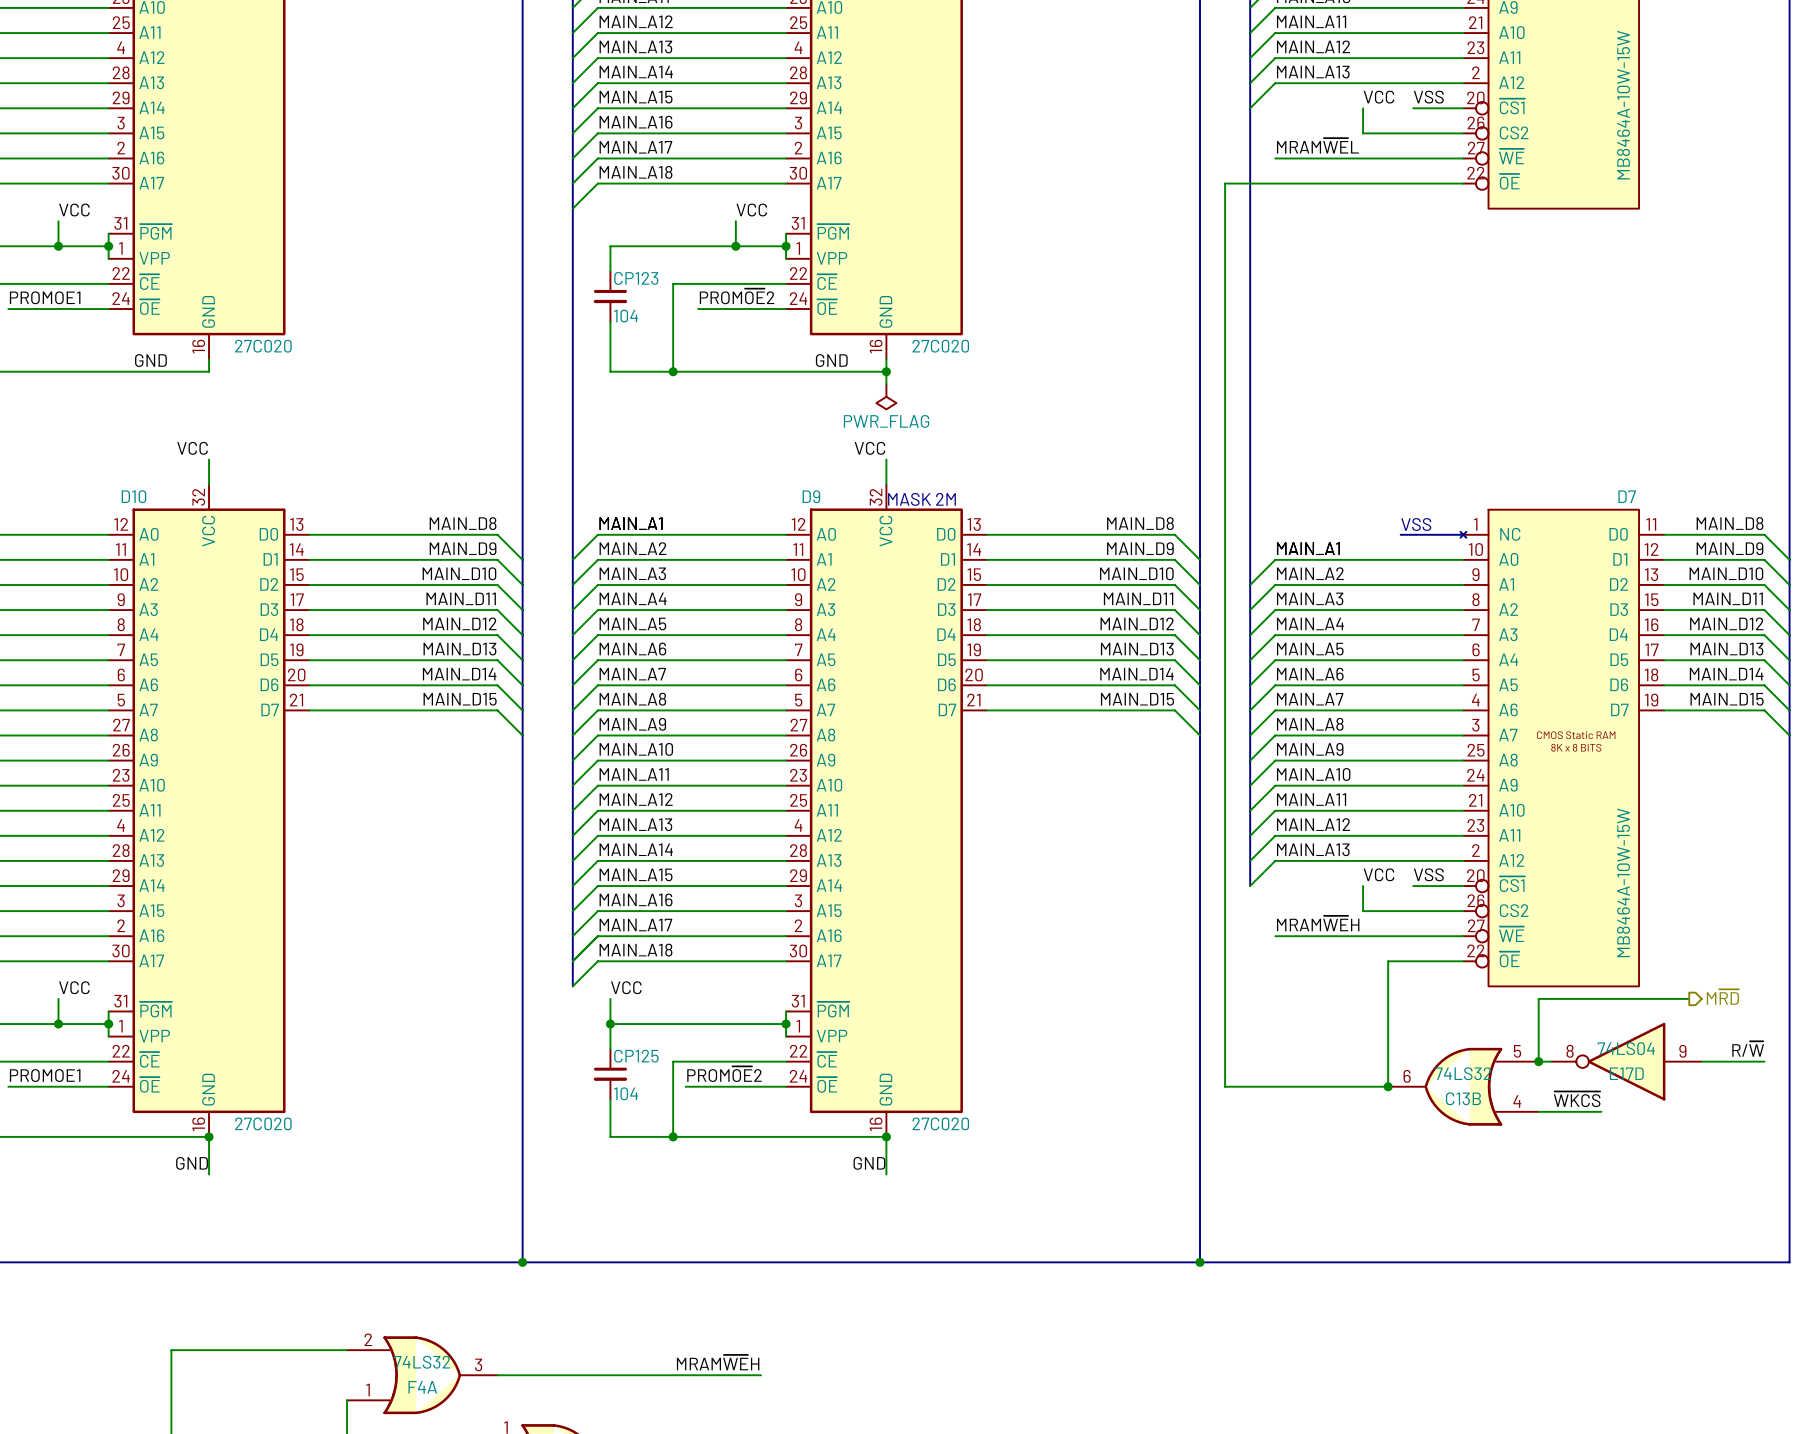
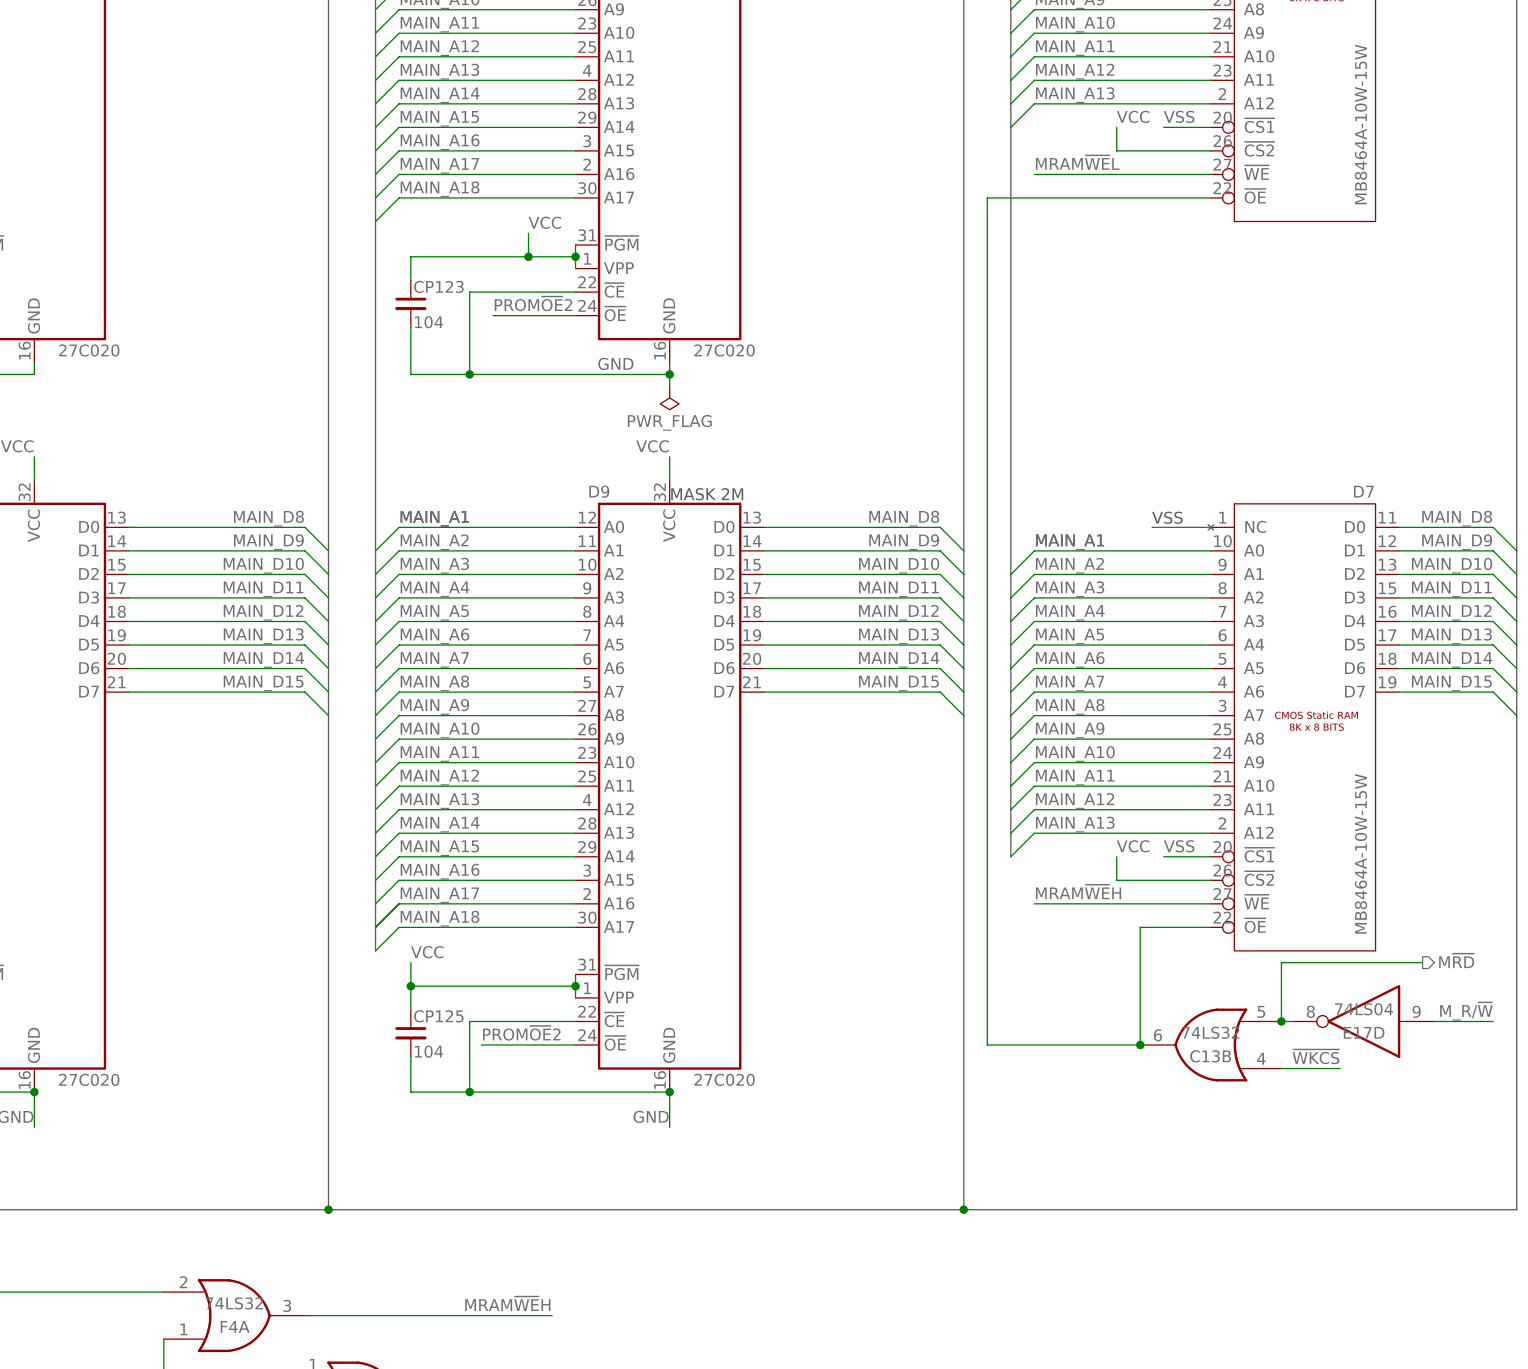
part pin name: CS2 (1514, 132) -> ~{CS2} (1259, 149)
D7 pin name: CS2 (1514, 910) -> ~{CS2} (1259, 878)
label: R/~{W} (1748, 1049) -> M_R/~{W} (1466, 1011)

